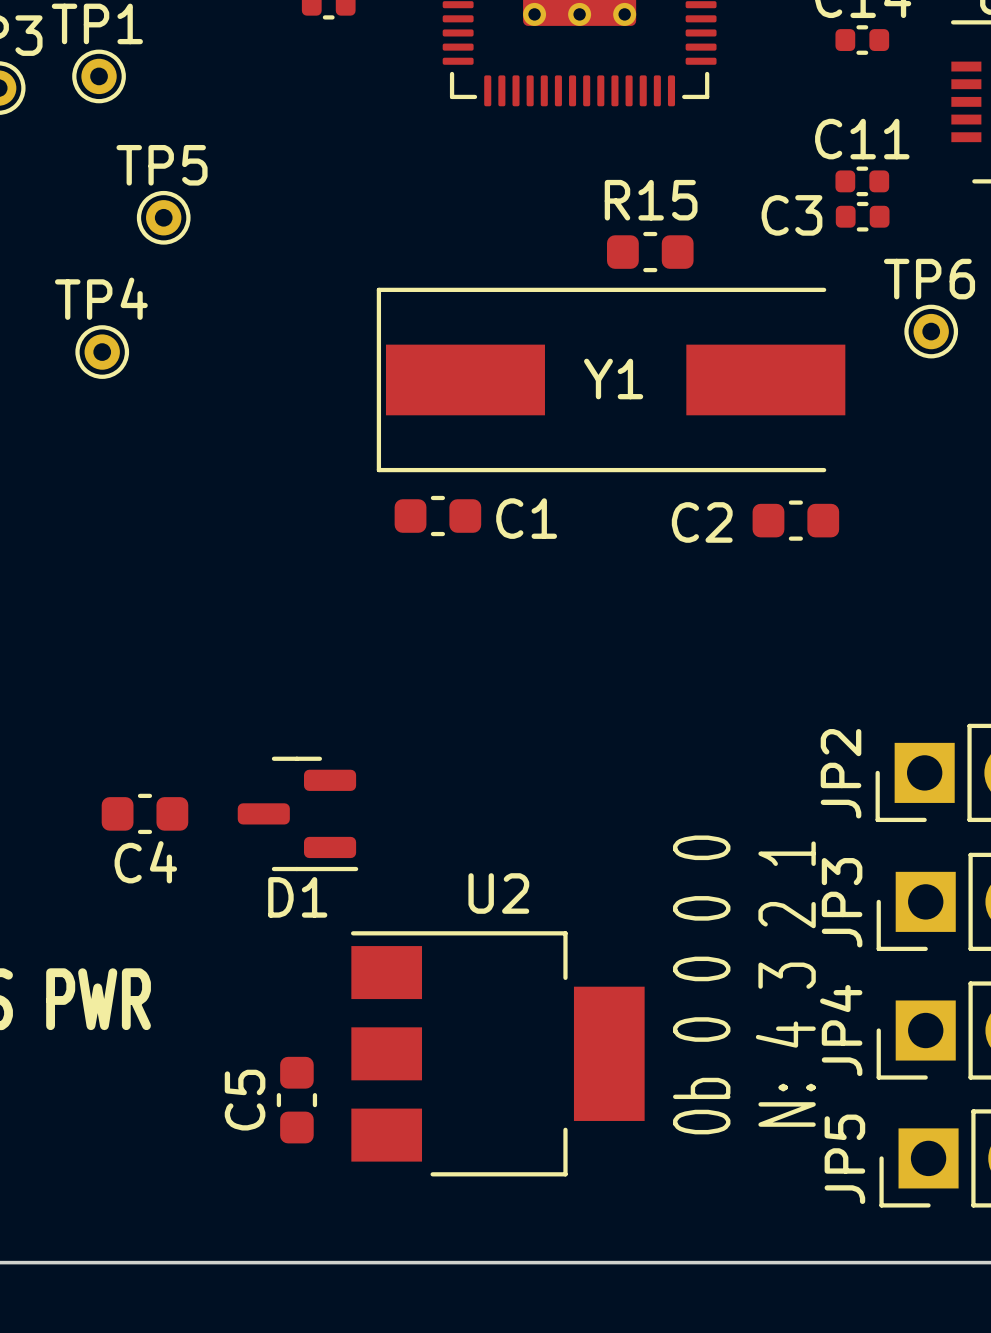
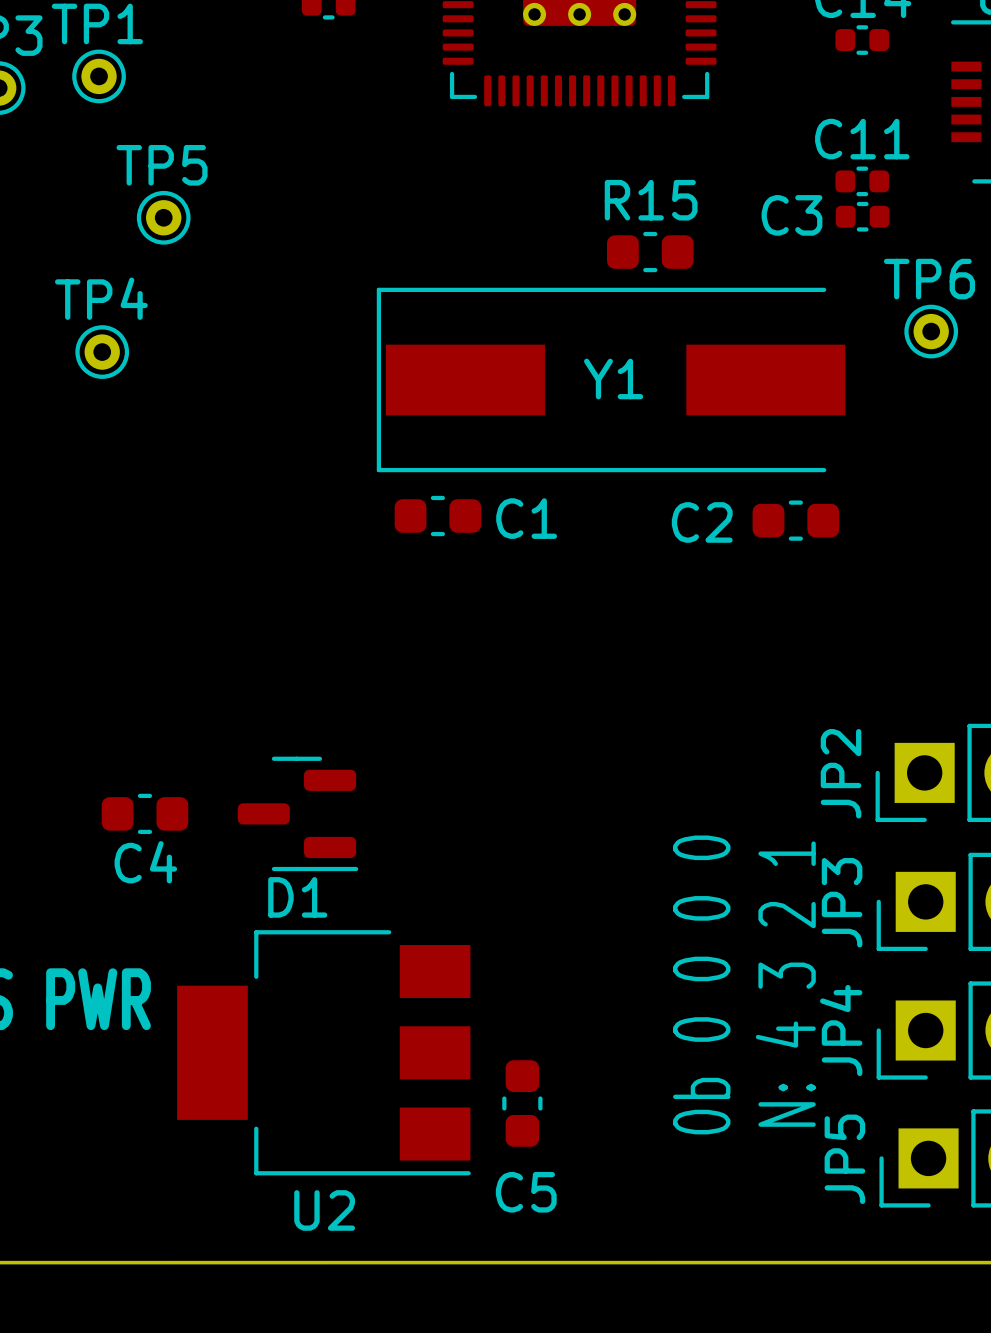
U2 rotation: 0° (497, 1053) -> 180° (323, 1052)
C5 name rotation: 0° (245, 1100) -> 90° clockwise (526, 1192)
C5 name position: C5 (245, 1100) -> C5 (526, 1192)
C5 position: (296, 1100) -> (522, 1103)

